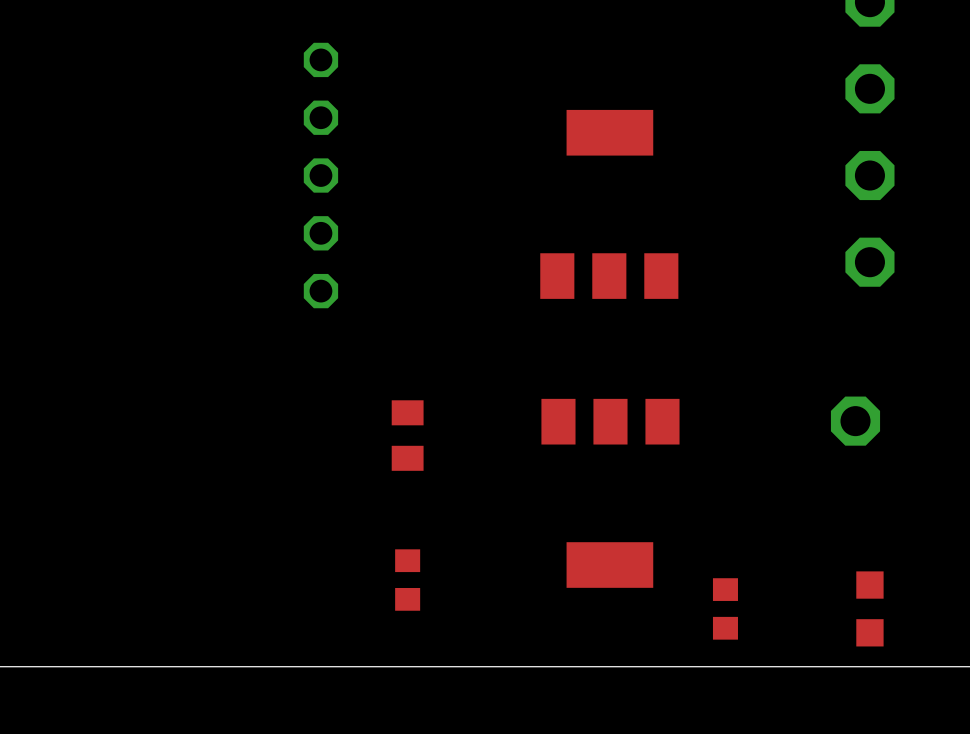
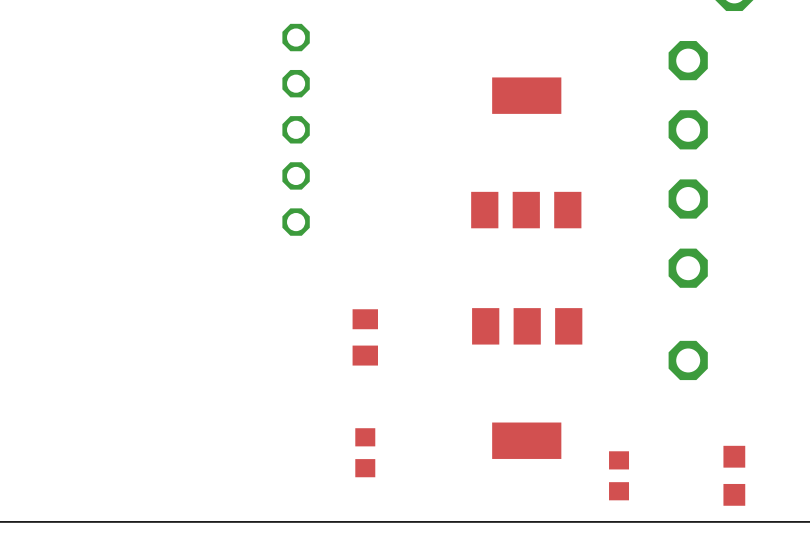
part: none -> (688, 60)
part: (869, 88) -> none
part: none -> (688, 129)
part: (869, 175) -> none
part: none -> (688, 199)
part: (869, 262) -> none
part: none -> (688, 268)
part: (855, 421) -> none
part: none -> (688, 360)

